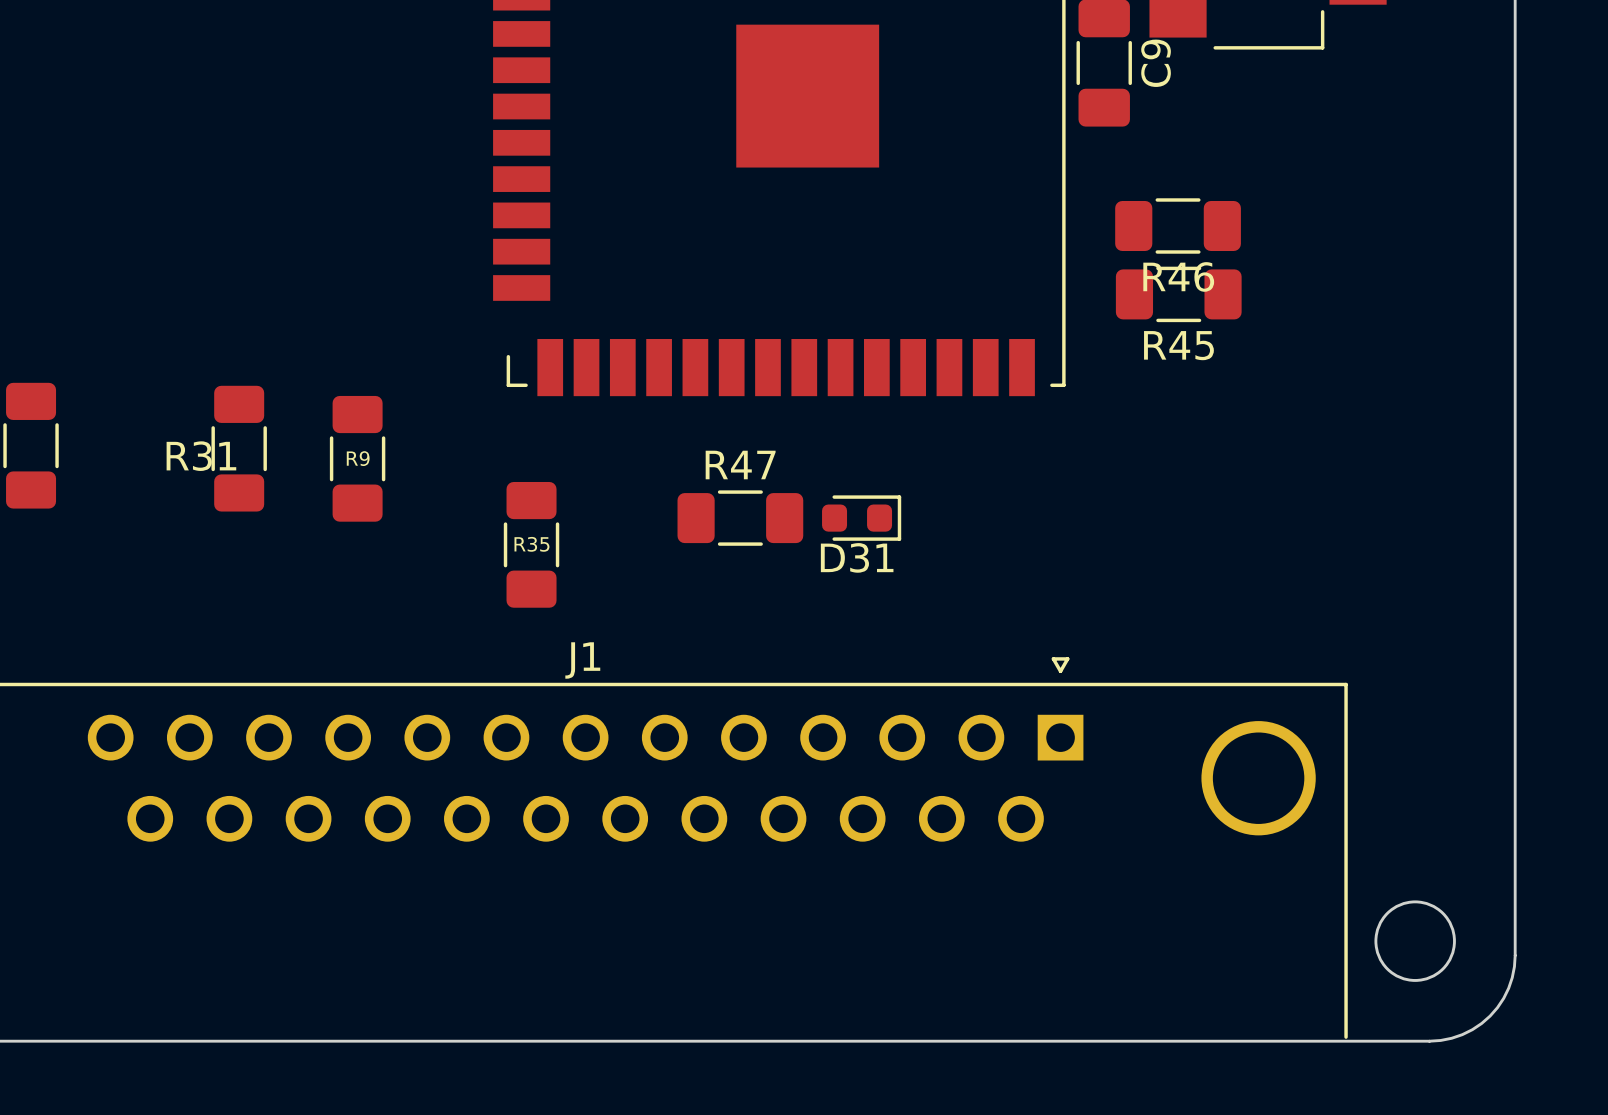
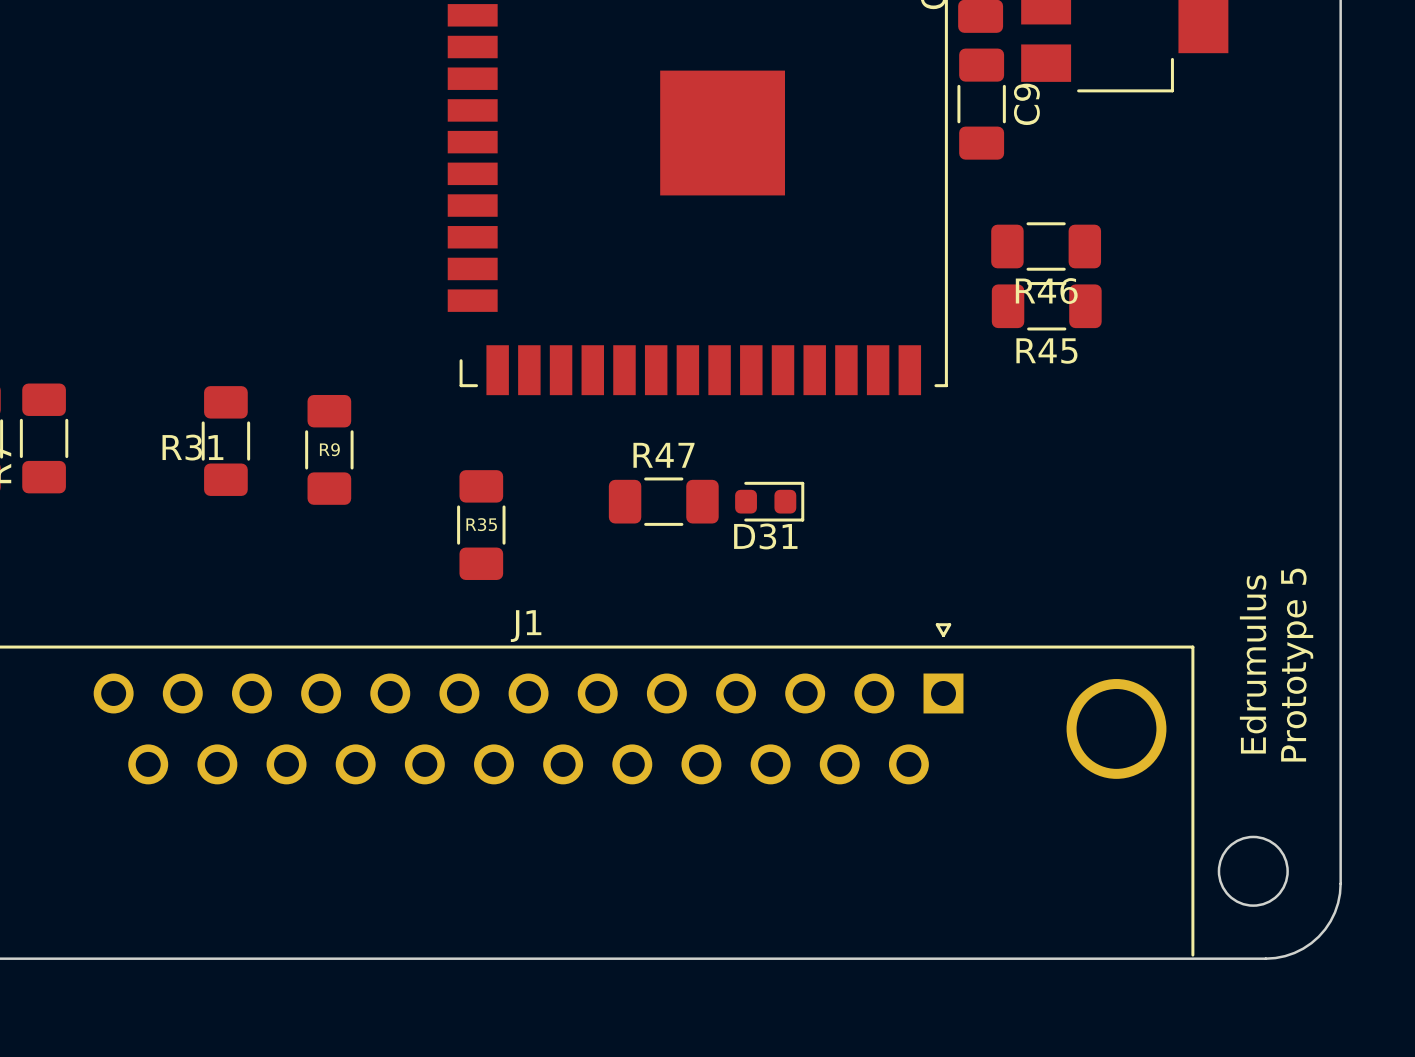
text: none -> Edrumulus (1253, 664)
text: none -> Prototype 5 (1297, 665)

